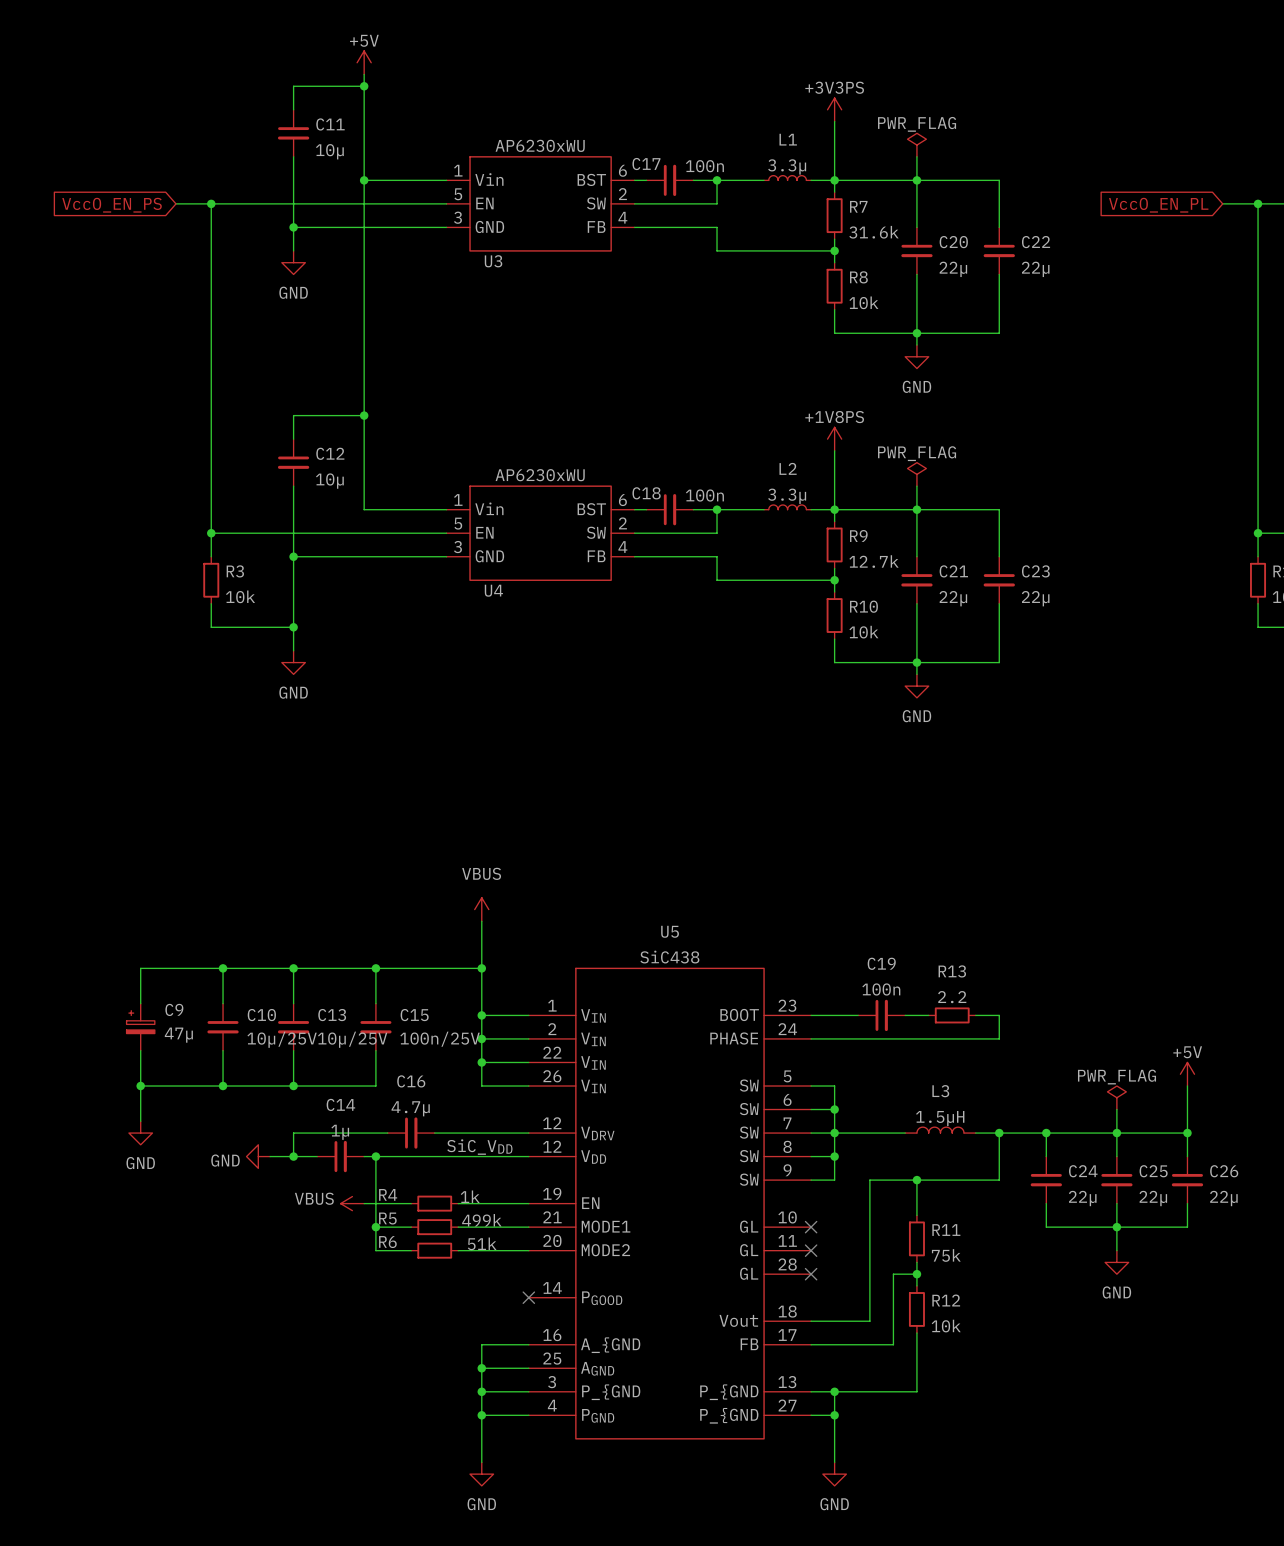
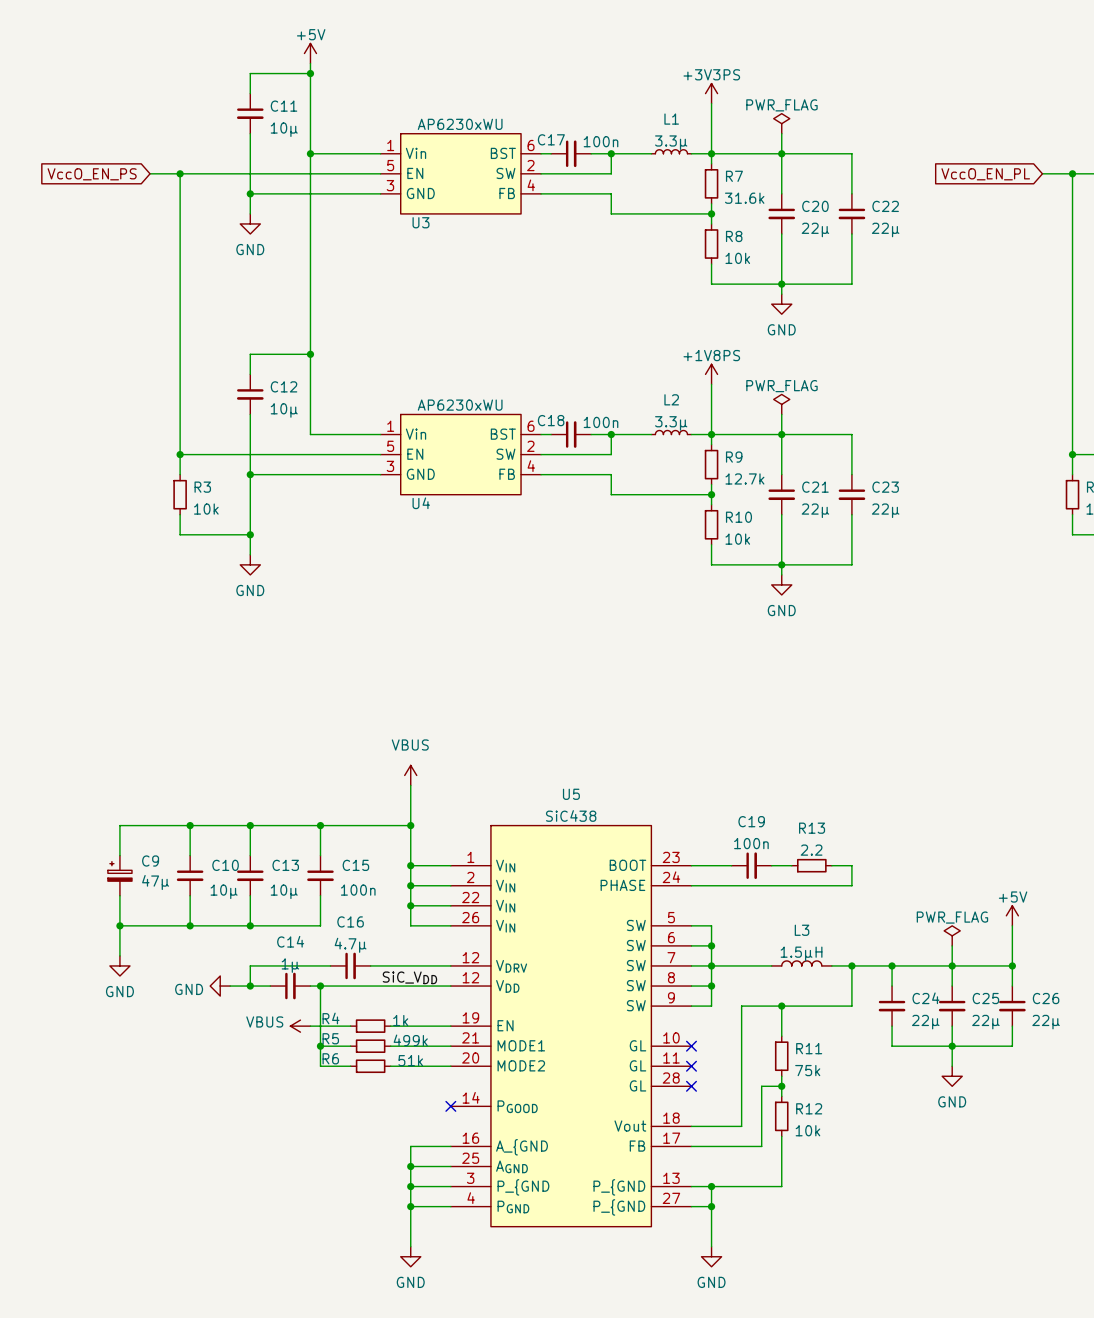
C10 value: 10µ/25V (282, 1039) -> 10µ (224, 891)
C13 value: 10µ/25V (352, 1039) -> 10µ (284, 891)
C15 value: 100n/25V (440, 1039) -> 100n (358, 890)

